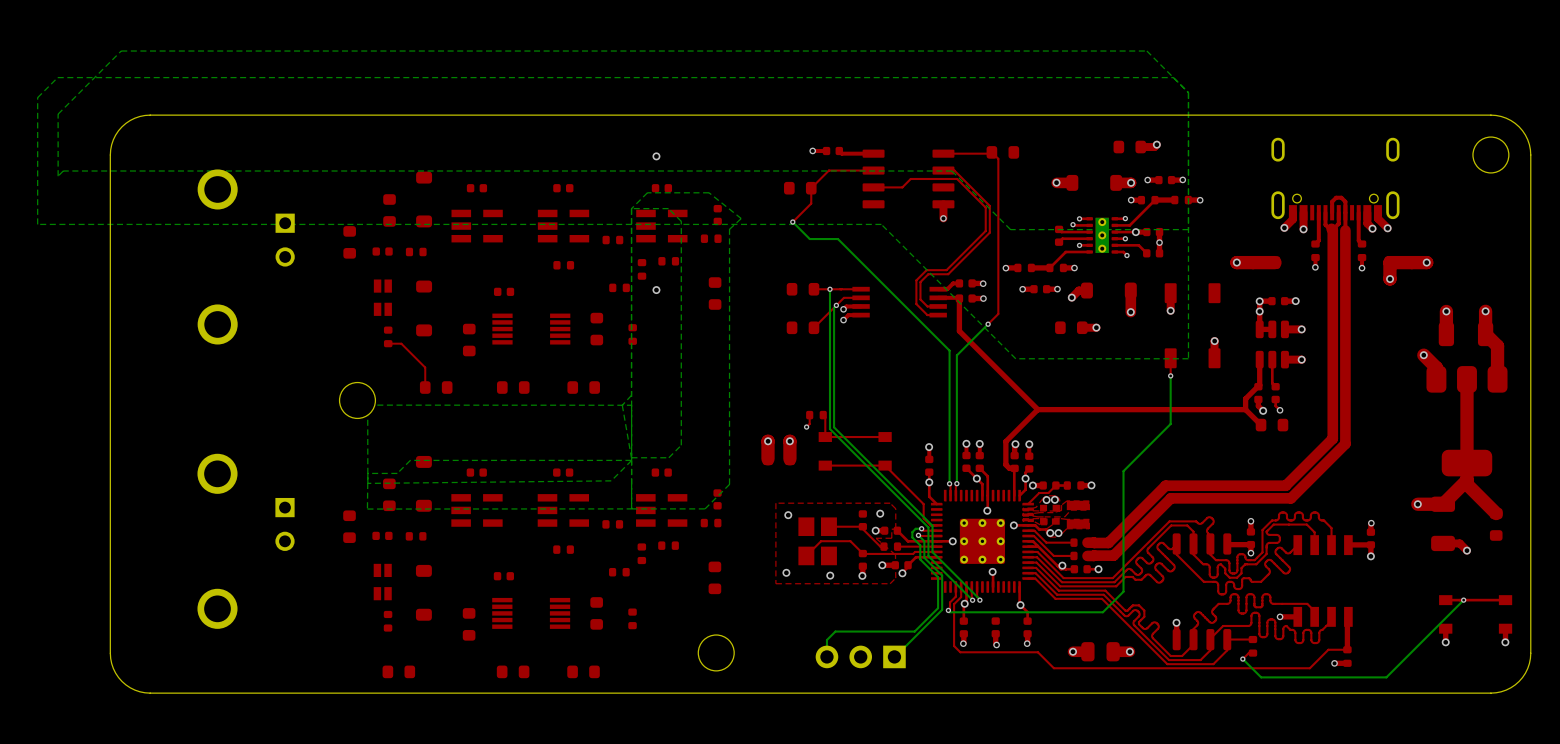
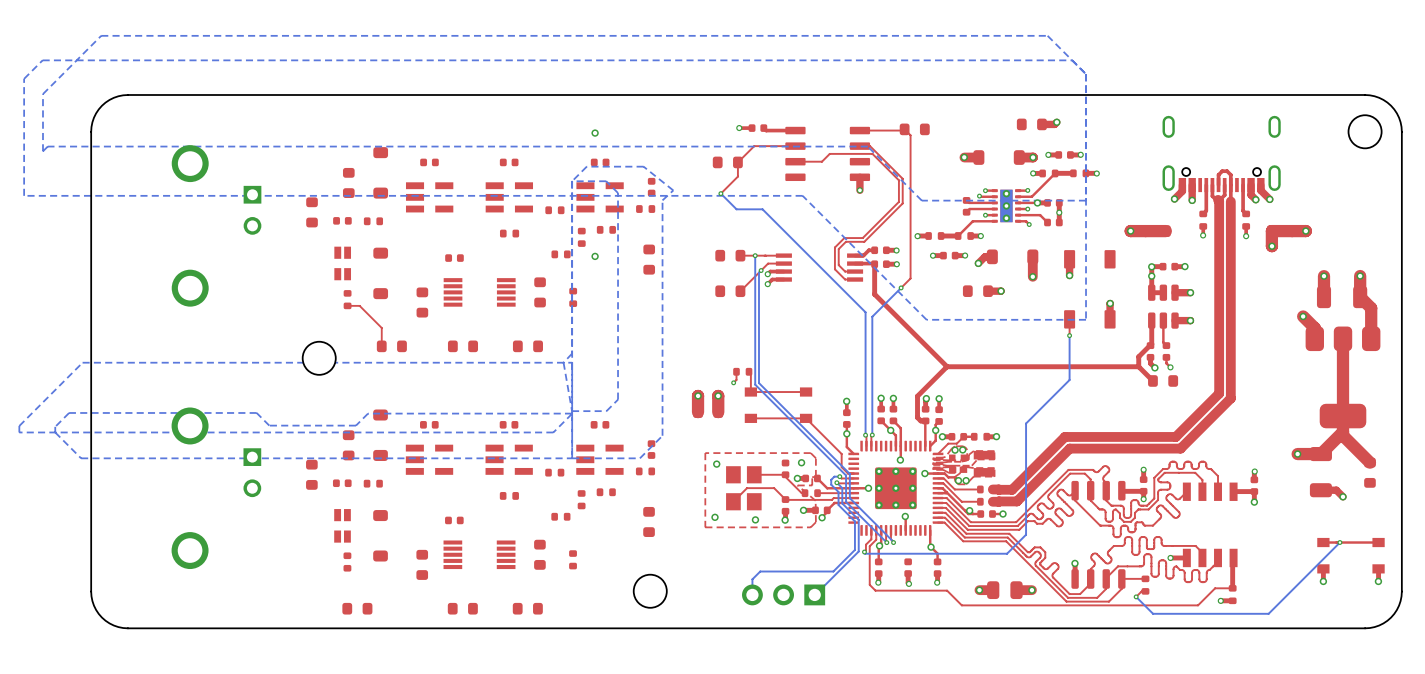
bottom zone outline: (631, 405) (367, 405) (367, 483) (611, 480) -> (572, 362) (82, 362) (19, 425) (19, 432) (553, 432)
bottom zone outline: (367, 473) (367, 509) (631, 508) -> (328, 425) (269, 425) (256, 412) (69, 412) (55, 426) (55, 432) (81, 458) (572, 458)

